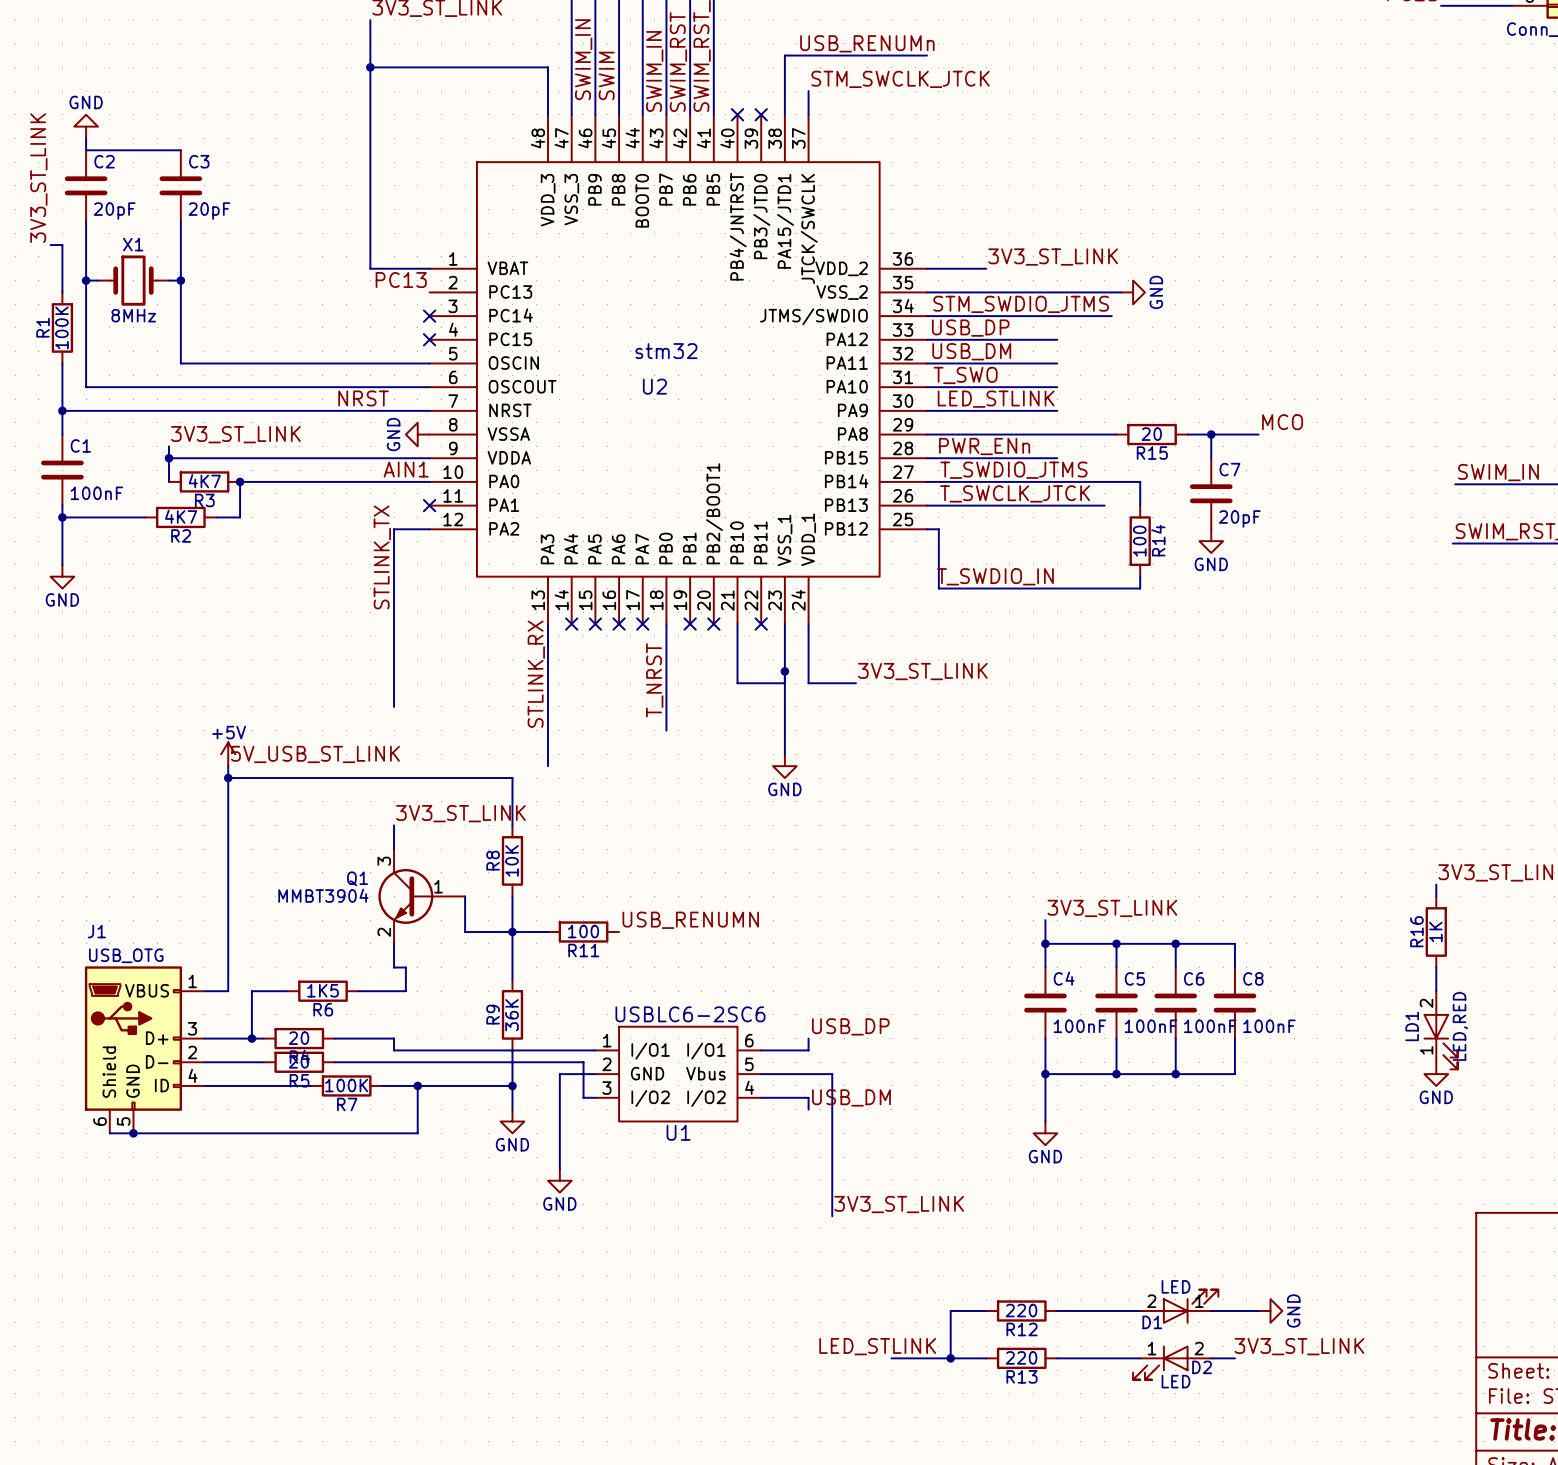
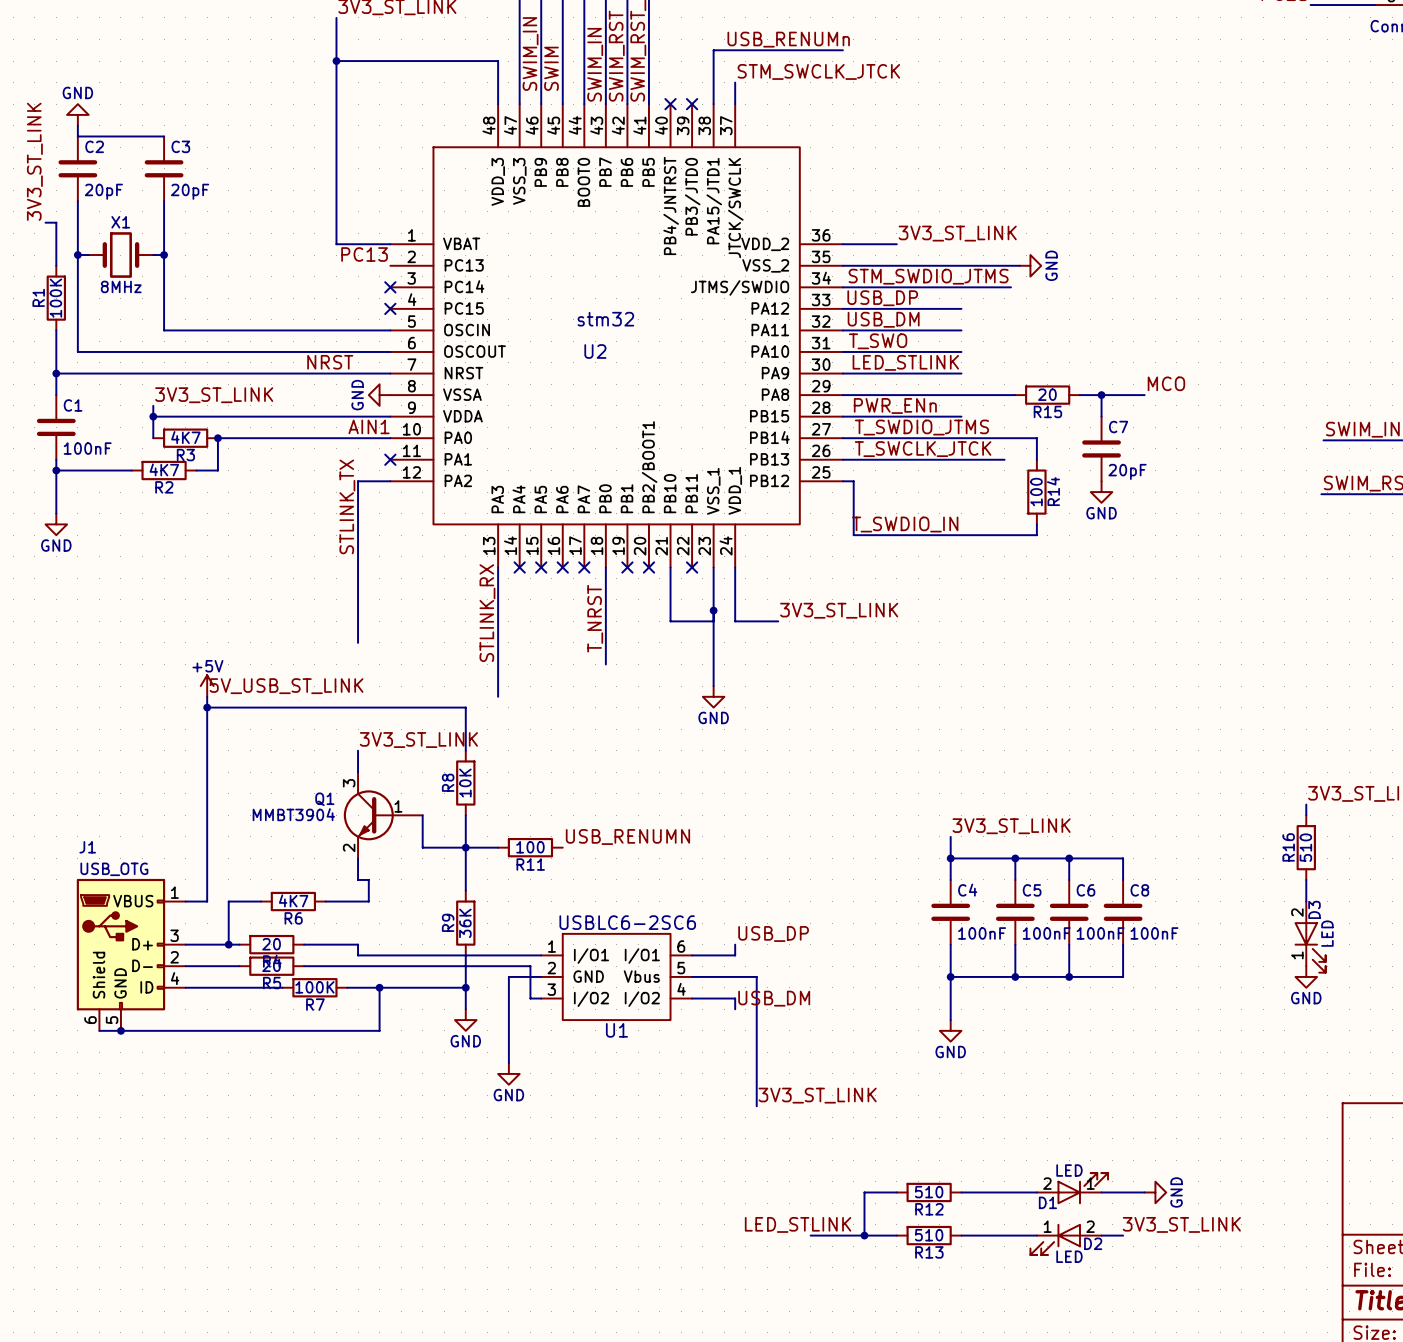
R16 value: 1K (1435, 931) -> 510 (1305, 847)
R6 value: 1K5 (322, 990) -> 4K7 (293, 900)
LD1 name: LD1 (1412, 1026) -> D3 (1314, 909)
LD1 value: LED,RED (1460, 1026) -> LED (1327, 933)
R12 value: 220 (1021, 1310) -> 510 (929, 1192)
R13 value: 220 (1021, 1357) -> 510 (929, 1235)

